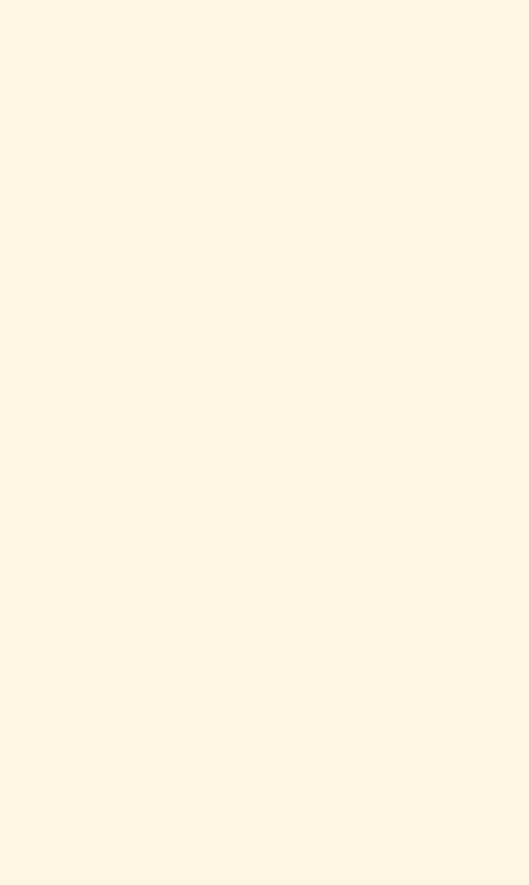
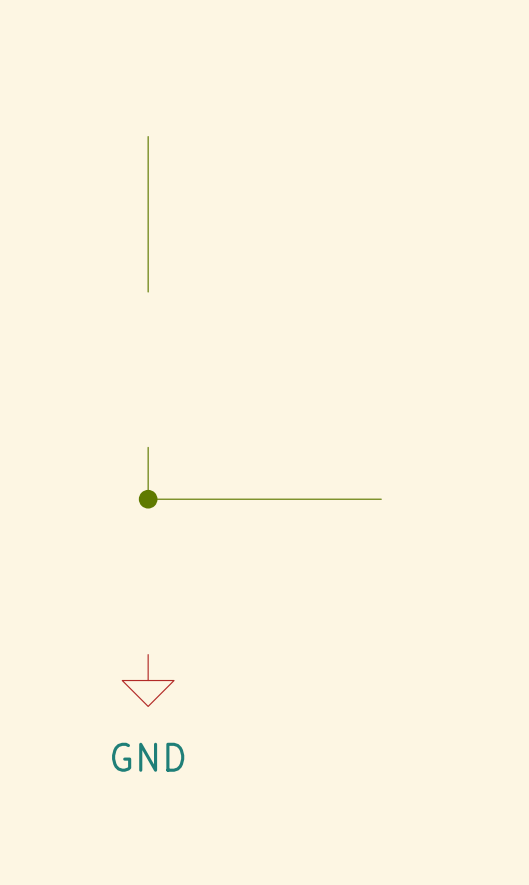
wire: none -> (148, 136) (148, 291)
wire: none -> (148, 447) (148, 499) (381, 499)
junction: none -> (148, 499)
power symbol: none -> GND (148, 680)

